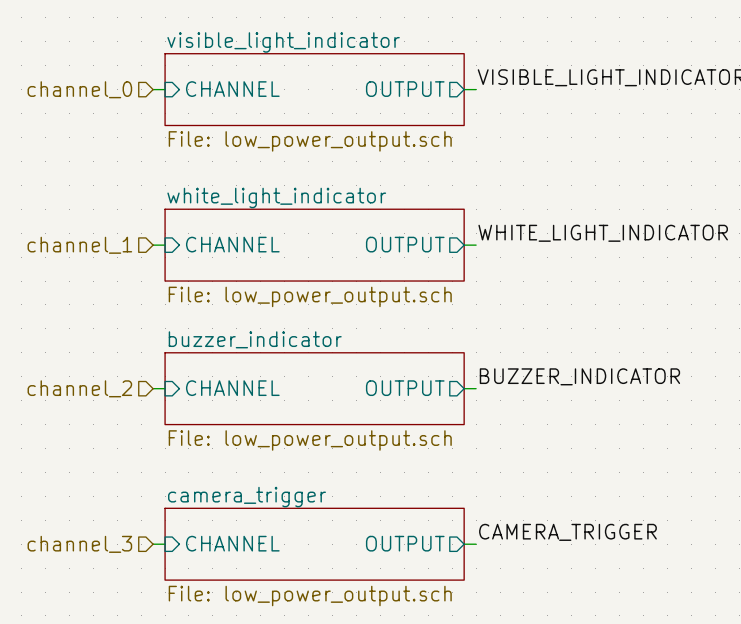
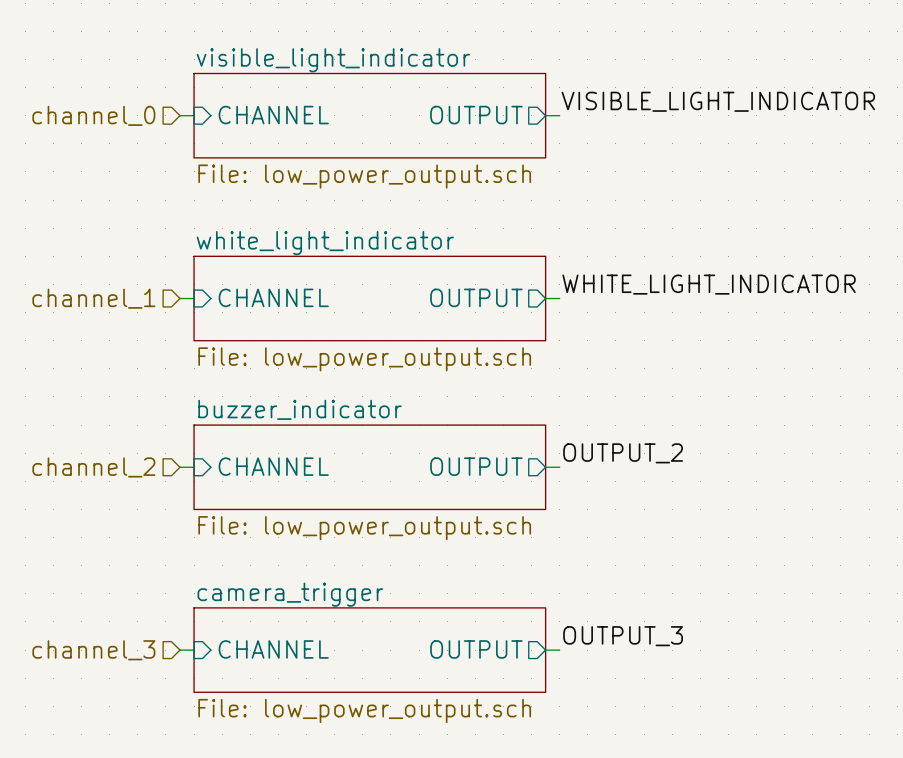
label: BUZZER_INDICATOR (579, 376) -> OUTPUT_2 (623, 453)
label: CAMERA_TRIGGER (567, 532) -> OUTPUT_3 (623, 636)

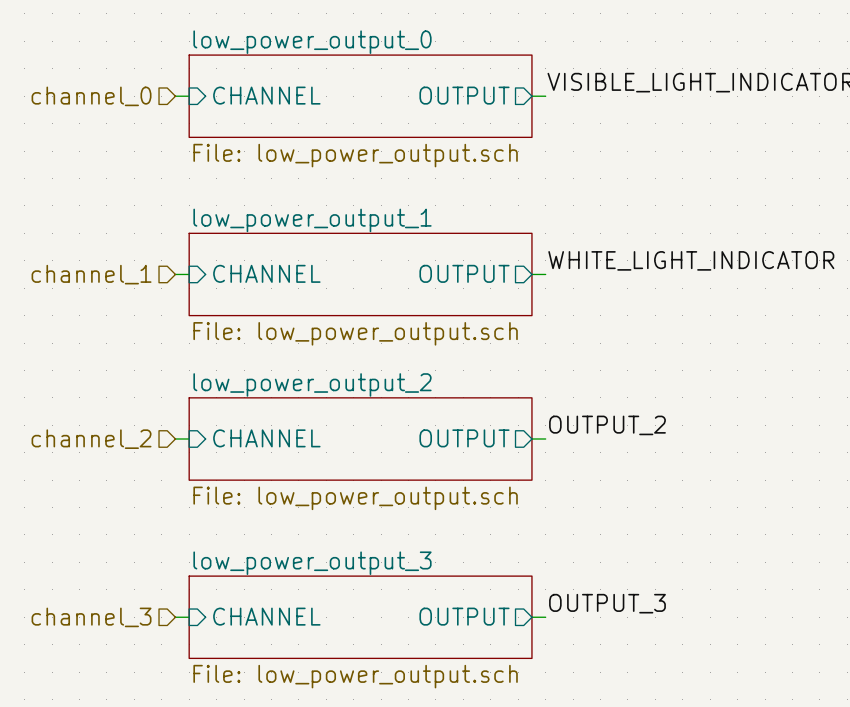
sheet visible_light_indicator name: visible_light_indicator (333, 60) -> low_power_output_0 (312, 42)
sheet white_light_indicator name: white_light_indicator (325, 243) -> low_power_output_1 (312, 220)
sheet buzzer_indicator name: buzzer_indicator (300, 409) -> low_power_output_2 (312, 384)
sheet camera_trigger name: camera_trigger (290, 594) -> low_power_output_3 (312, 563)

